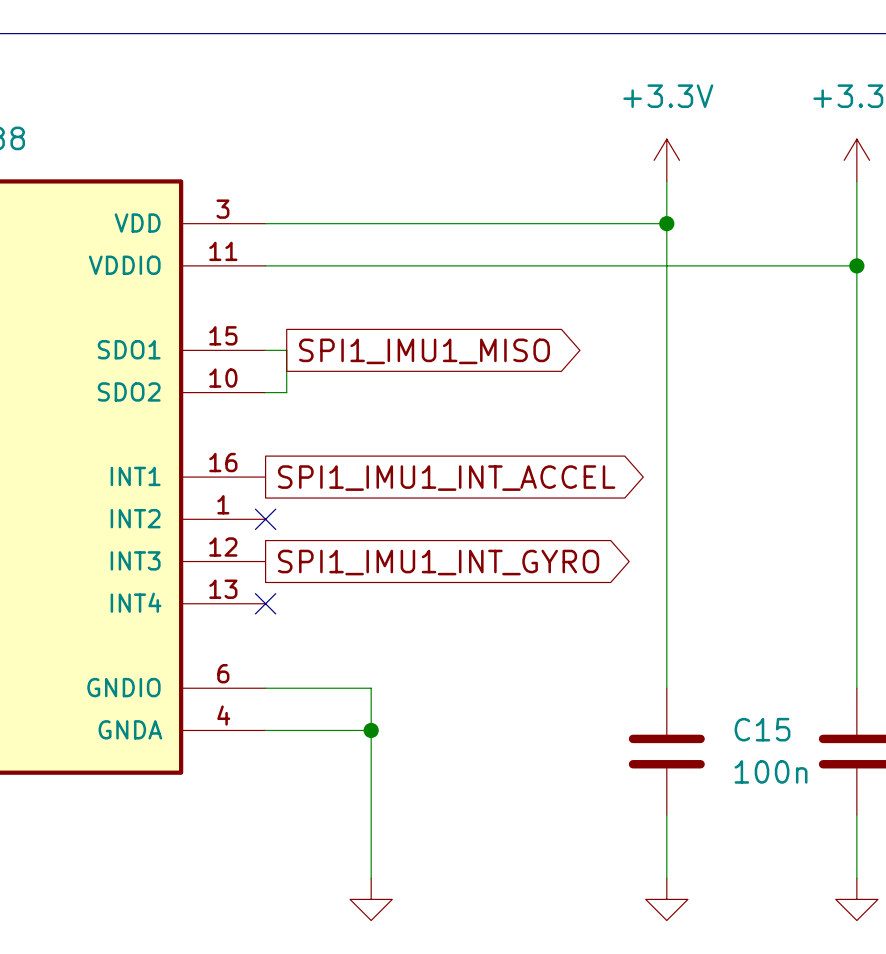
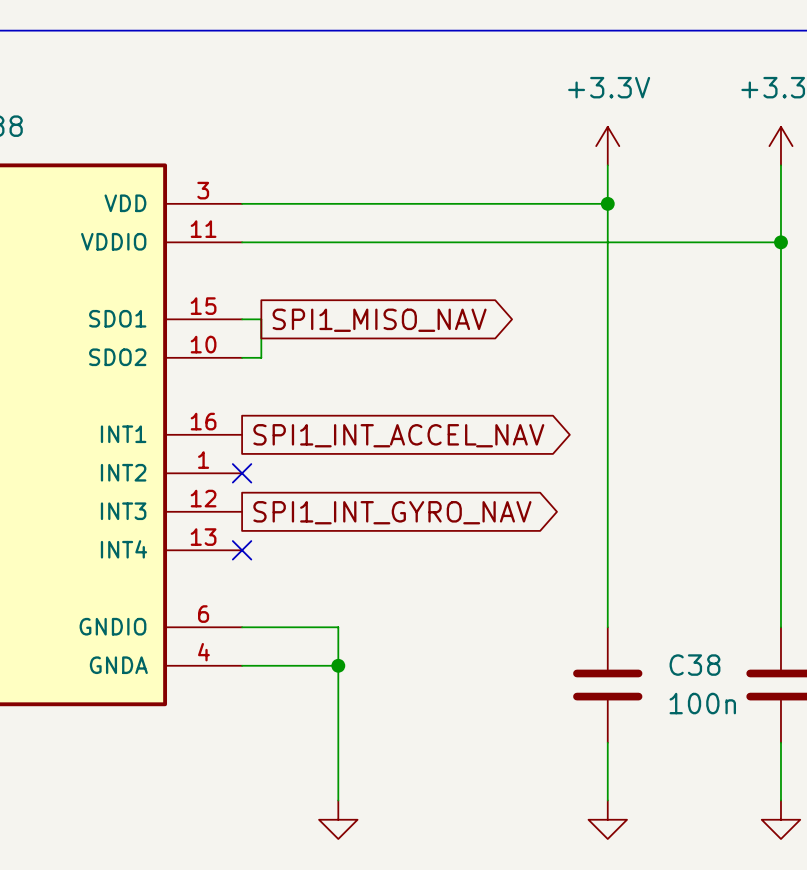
global label: SPI1_IMU1_MISO (424, 351) -> SPI1_MISO_NAV (379, 320)
global label: SPI1_IMU1_INT_ACCEL (446, 478) -> SPI1_INT_ACCEL_NAV (398, 435)
global label: SPI1_IMU1_INT_GYRO (438, 562) -> SPI1_INT_GYRO_NAV (392, 512)
C15 name: C15 (762, 729) -> C38 (694, 665)

